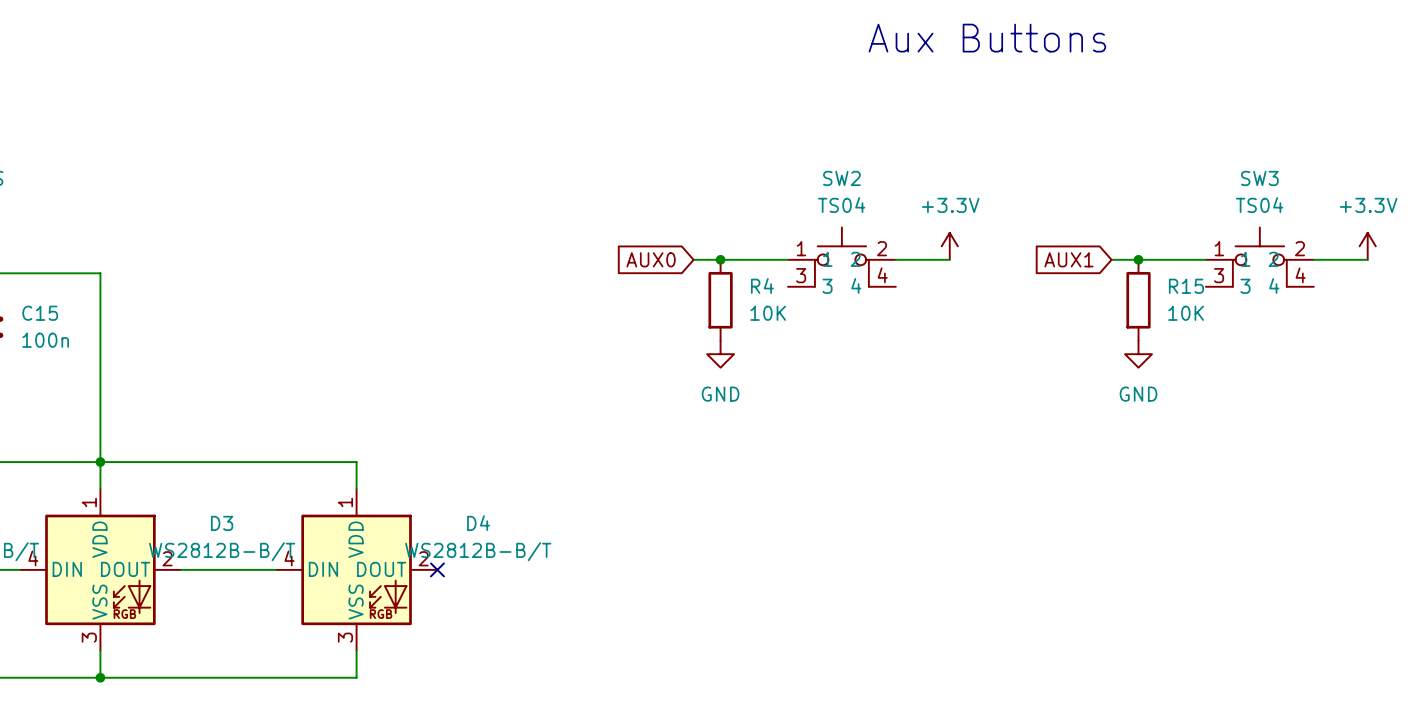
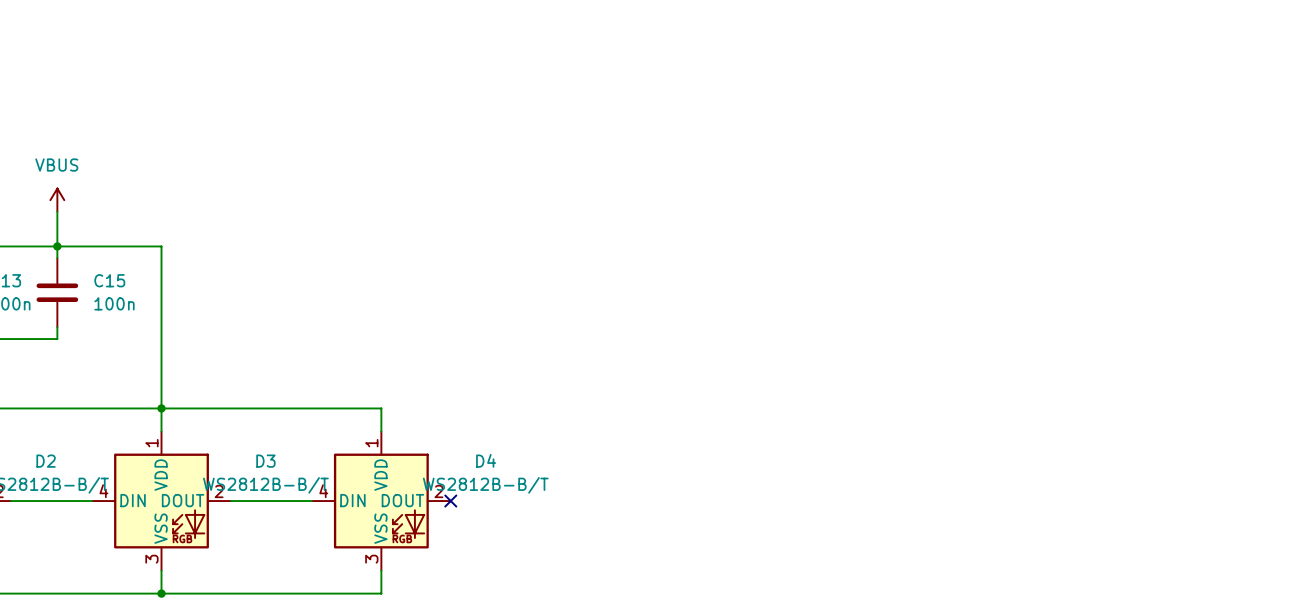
text: Aux Buttons (987, 38) -> none
power symbol: +3.3V (949, 246) -> none
power symbol: +3.3V (1367, 246) -> none
SW2: TS04 (841, 257) -> none
SW3: TS04 (1259, 257) -> none
global label: AUX0 (651, 259) -> none
wire: (693, 259) (787, 259) -> none
junction: (720, 259) -> none
wire: (895, 259) (949, 259) -> none
global label: AUX1 (1069, 259) -> none
wire: (1111, 259) (1205, 259) -> none
junction: (1138, 259) -> none
wire: (1313, 259) (1367, 259) -> none
R4: 10K (720, 300) -> none
R15: 10K (1138, 300) -> none
power symbol: GND (720, 354) -> none
power symbol: GND (1138, 354) -> none

